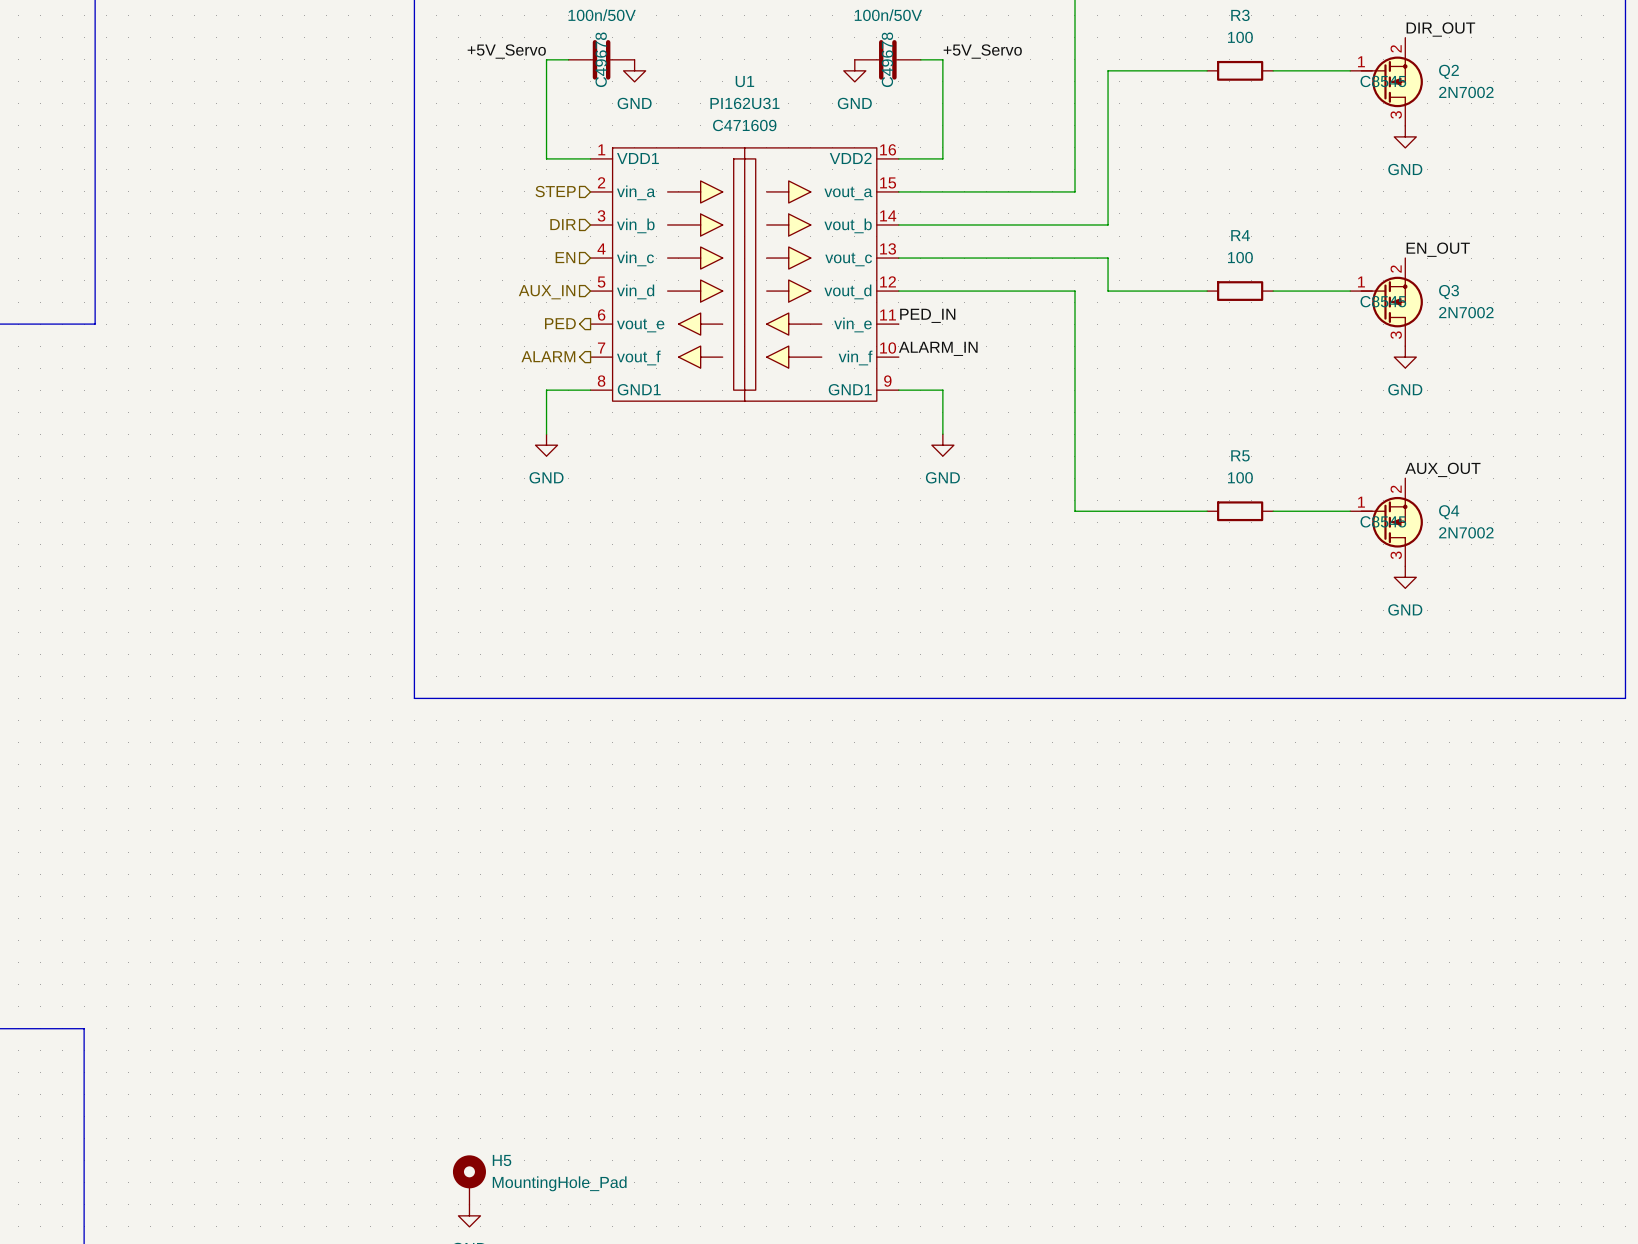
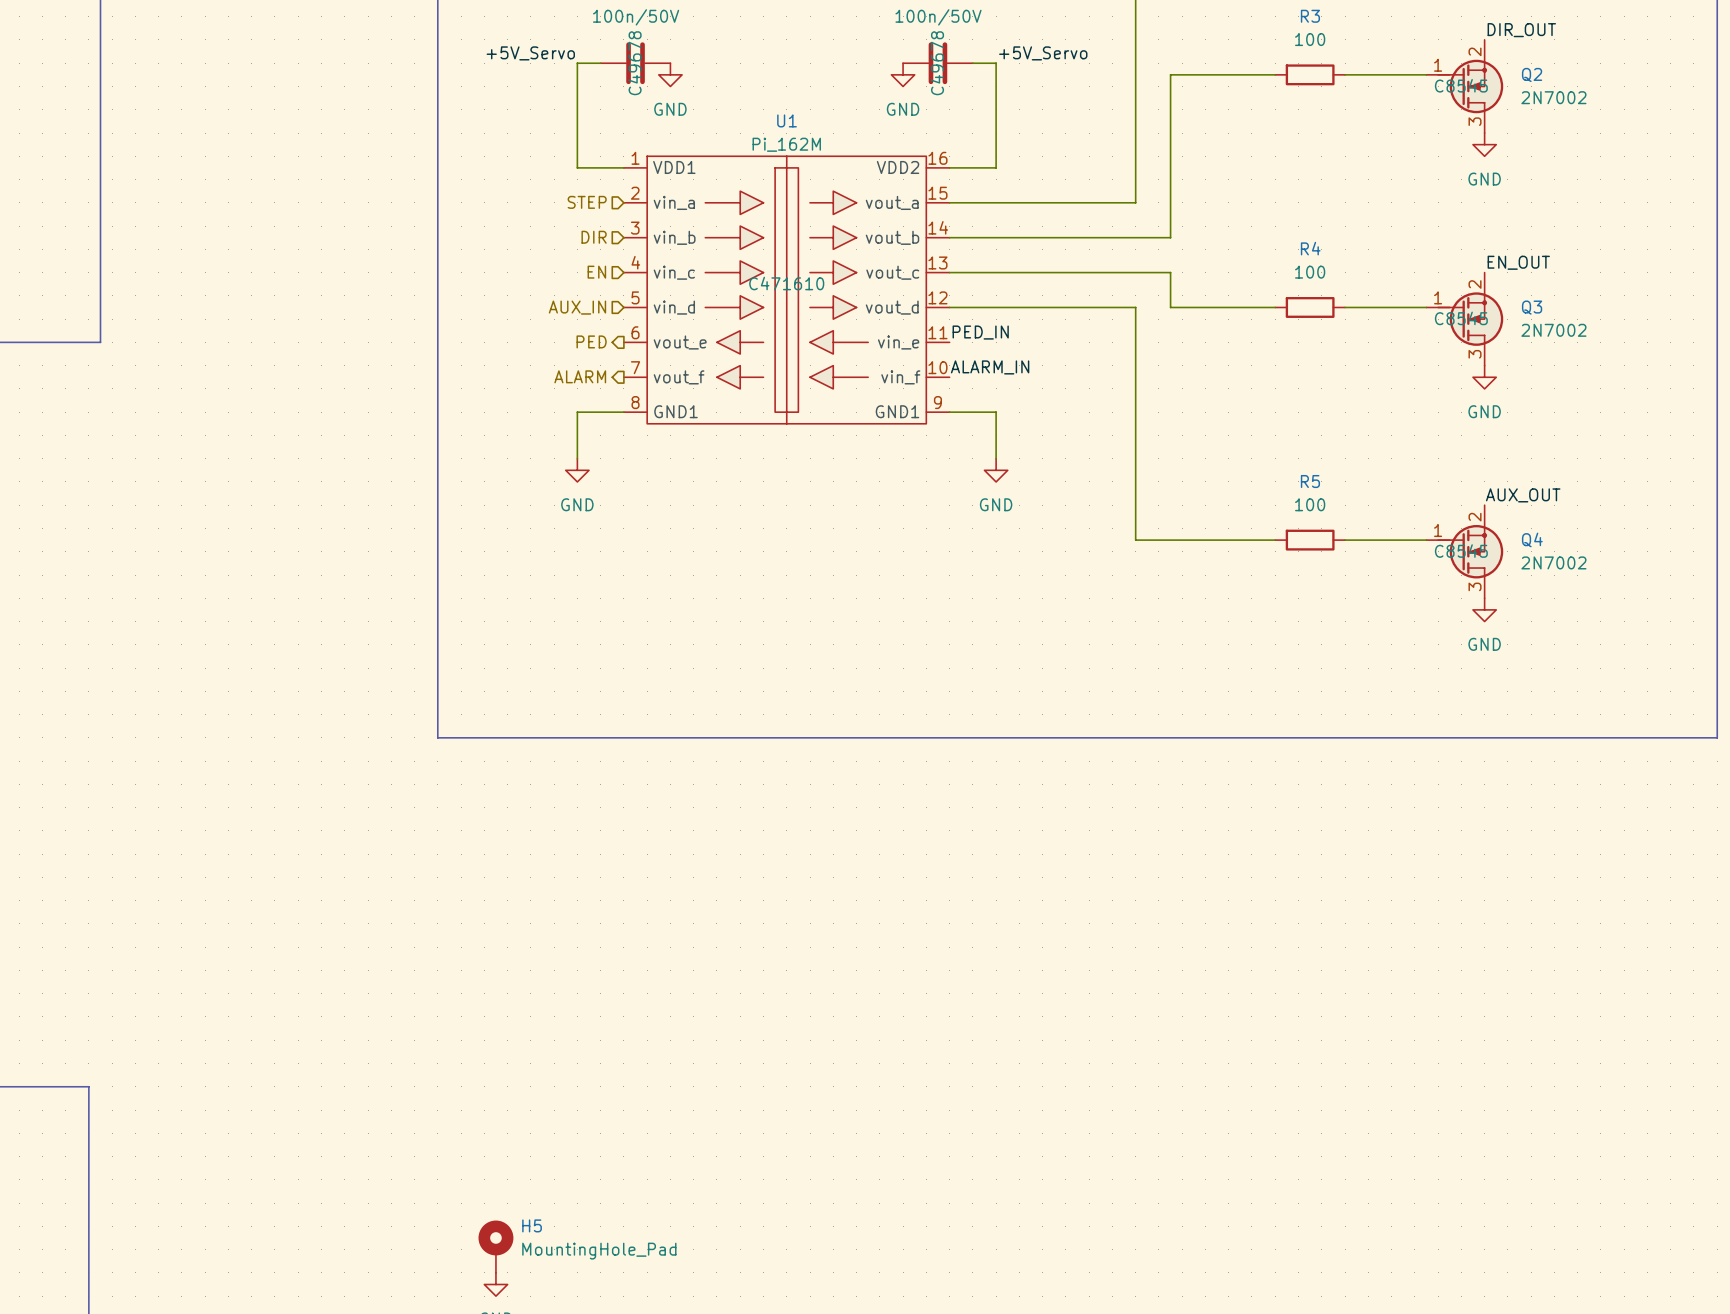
U1 name position: U1 (744, 81) -> U1 (787, 120)
U1 value: PI162U31 (744, 103) -> Pi_162M (786, 144)
U1 text: C471609 (744, 125) -> C471610 (786, 283)

